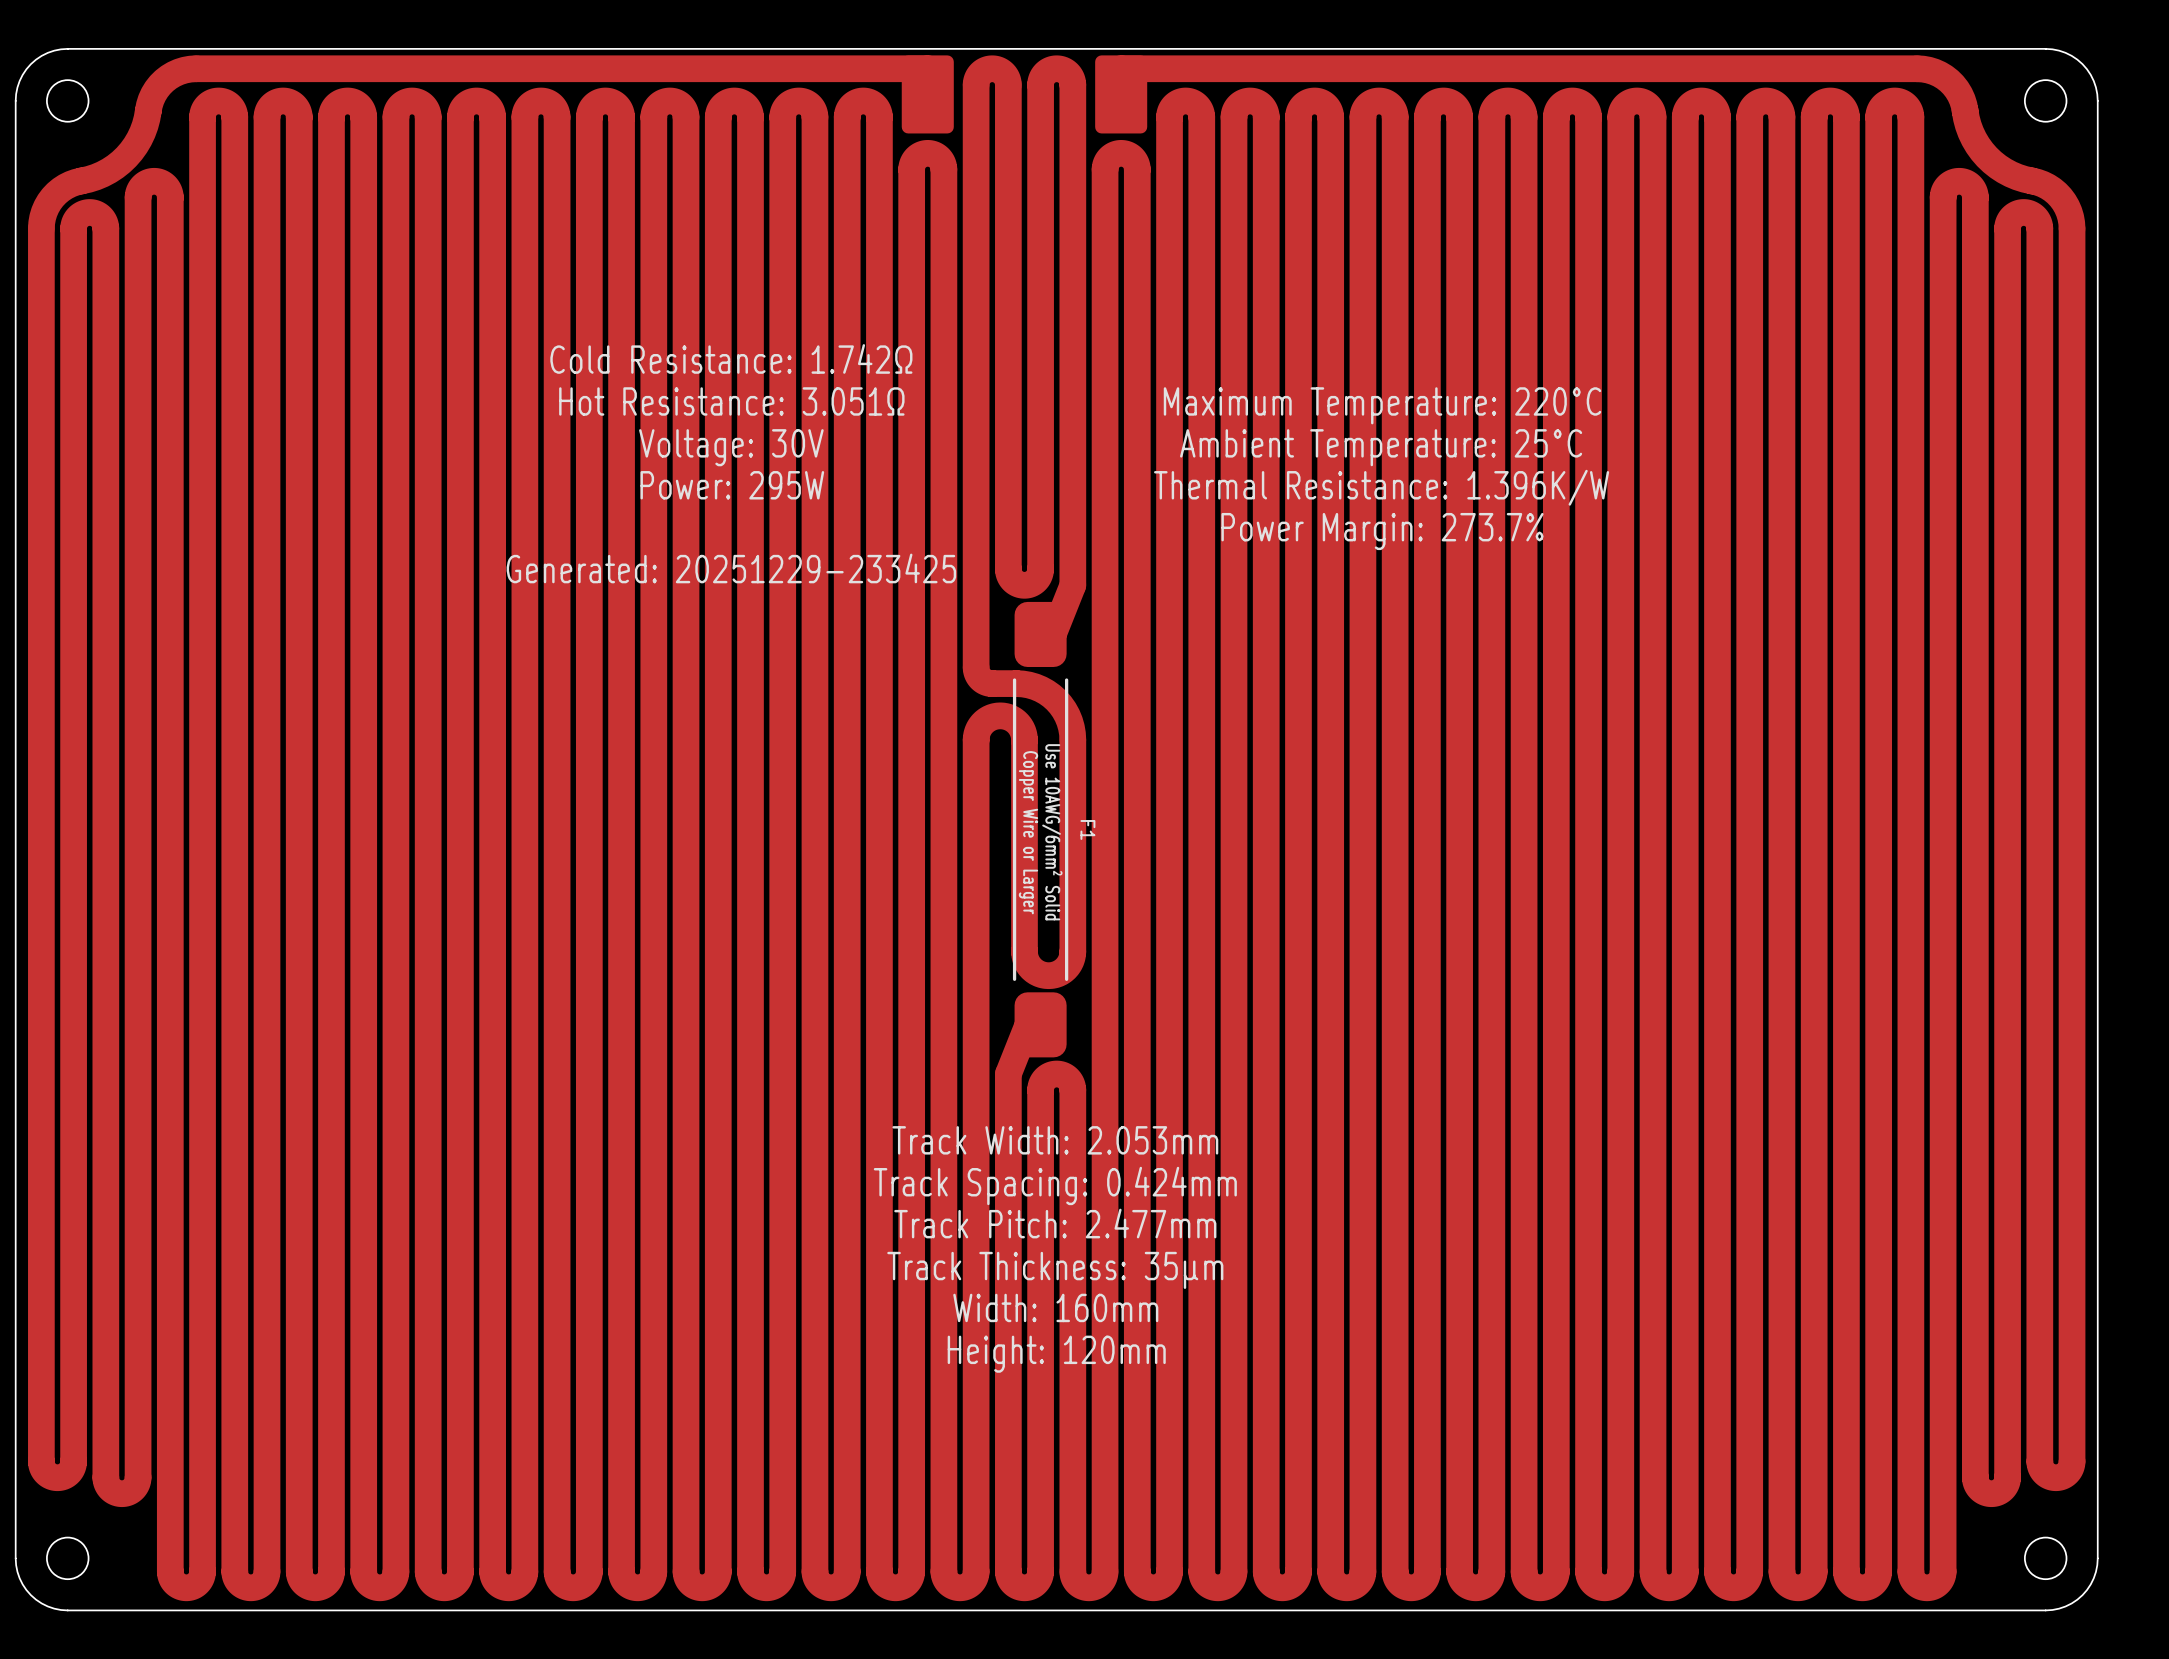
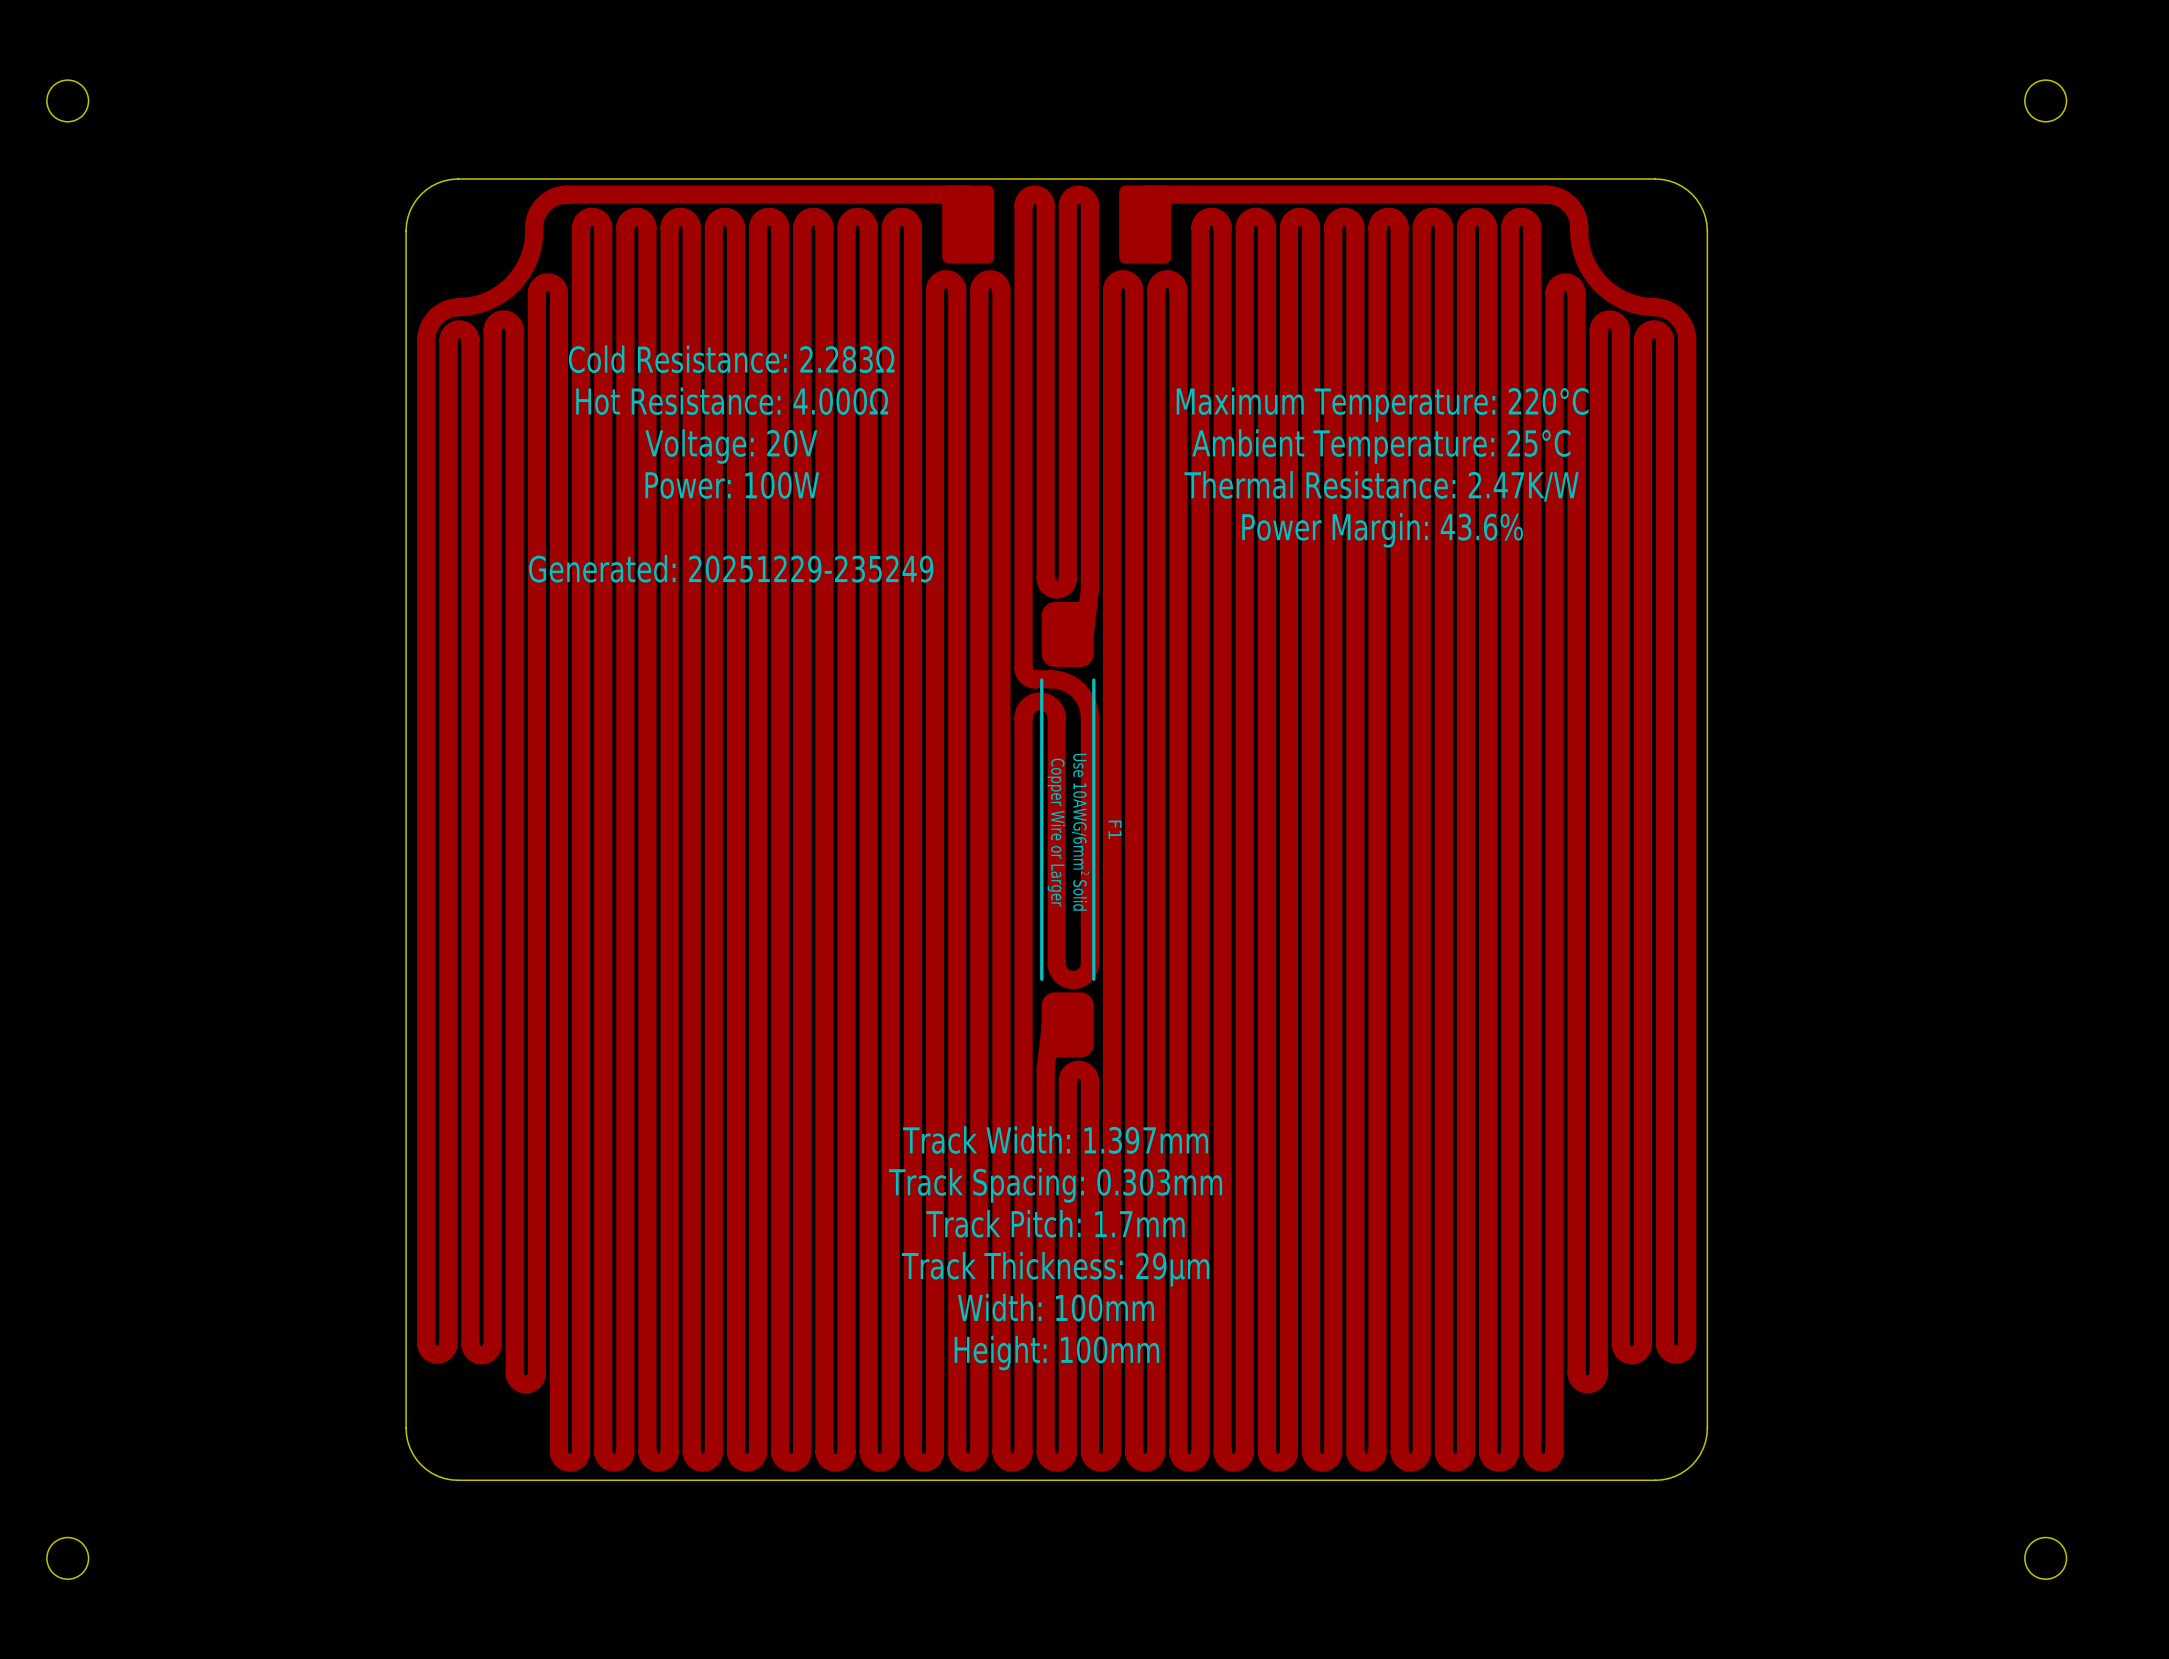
board edge: (67, 48) (2045, 48) (2065, 52) (2077, 59) (2090, 74) (2095, 87) (2097, 100) (2097, 1558) (2093, 1578) (2086, 1590) (2077, 1599) (2065, 1606) (2045, 1610) (67, 1610) (54, 1608) (36, 1599) (22, 1584) (17, 1571) (15, 1558) (15, 100) (19, 81) (30, 64) (47, 52) (67, 48) -> (458, 179) (438, 182) (421, 194) (410, 211) (406, 231) (406, 1428) (410, 1448) (421, 1465) (438, 1476) (458, 1480) (1655, 1480) (1675, 1476) (1692, 1465) (1703, 1448) (1707, 1428) (1707, 231) (1703, 211) (1692, 194) (1675, 182) (1655, 179) (458, 179)
track: (927, 94) (927, 68) (190, 69) (173, 74) (156, 89) (151, 99) (142, 132) (126, 157) (102, 174) (65, 186) (52, 197) (46, 206) (41, 228) (41, 1463) (48, 1474) (59, 1477) (69, 1472) (73, 1461) (73, 228) (77, 217) (89, 212) (101, 217) (105, 228) (105, 1477) (109, 1488) (120, 1493) (132, 1489) (137, 1479) (138, 197) (140, 189) (144, 184) (156, 181) (166, 187) (170, 197) (170, 1571) (173, 1581) (182, 1587) (190, 1587) (196, 1584) (201, 1577) (202, 1571) (202, 117) (205, 107) (212, 102) (224, 102) (231, 107) (234, 117) (234, 1571) (239, 1583) (248, 1587) (257, 1586) (262, 1583) (267, 1571) (267, 117) (272, 105) (281, 101) (290, 102) (296, 107) (299, 117) (299, 1571) (303, 1583) (313, 1587) (321, 1586) (326, 1583) (331, 1571) (331, 117) (333, 109) (338, 103) (347, 100) (355, 102) (361, 109) (363, 117) (363, 1571) (367, 1582) (377, 1587) (390, 1583) (395, 1571) (395, 117) (398, 107) (406, 102) (414, 101) (421, 103) (426, 109) (428, 117) (428, 1571) (432, 1583) (444, 1587) (455, 1583) (460, 1571) (460, 117) (464, 106) (474, 101) (487, 105) (492, 115) (492, 330) -> (1067, 634) (1084, 634) (1089, 589) (1089, 204) (1086, 197) (1078, 194) (1071, 197) (1067, 204) (1067, 578) (1064, 586) (1055, 589) (1047, 585) (1045, 578) (1045, 205) (1041, 197) (1033, 194) (1026, 198) (1023, 205) (1023, 669) (1026, 676) (1031, 678) (1056, 679) (1070, 684) (1081, 694) (1088, 708) (1089, 965) (1084, 975) (1075, 979) (1063, 977) (1057, 967) (1056, 715) (1050, 704) (1042, 701) (1035, 702) (1026, 707) (1023, 718) (1023, 1451) (1019, 1460) (1011, 1462) (1004, 1459) (1001, 1451) (1001, 290) (997, 281) (989, 279) (982, 282) (979, 290) (979, 1451) (974, 1460) (965, 1462) (959, 1458) (957, 1451) (957, 290) (953, 281) (943, 279) (937, 283) (935, 290) (935, 1451) (931, 1459) (922, 1462) (915, 1458) (912, 1451) (912, 227) (908, 219) (897, 217) (892, 222) (890, 227) (890, 1451) (887, 1459) (877, 1462) (871, 1459) (868, 1451) (868, 227) (863, 218) (852, 218) (846, 227) (846, 1451) (842, 1460) (832, 1462) (826, 1458) (824, 1451) (824, 227) (818, 218) (807, 218) (802, 227) (802, 1451) (797, 1460) (788, 1462) (782, 1458) (780, 1451) (780, 227) (774, 218) (769, 216) (762, 219) (758, 227) (758, 1451) (753, 1460) (743, 1462) (737, 1457) (735, 1451) (735, 227) (730, 218) (723, 216) (718, 219) (713, 227) (713, 1451) (709, 1460) (698, 1462) (693, 1457) (691, 1451) (691, 227) (689, 221) (684, 217) (677, 217) (672, 219) (669, 227) (669, 1451) (667, 1457) (663, 1461) (653, 1461) (649, 1457) (647, 1451) (647, 227) (645, 221) (640, 217) (633, 217) (628, 219) (625, 227) (625, 1451) (619, 1461) (608, 1461) (603, 1451) (603, 227) (600, 221) (595, 217) (589, 217) (583, 221) (581, 227) (581, 1451) (576, 1460) (570, 1462) (564, 1461) (560, 1456) (558, 1451) (558, 293) (556, 286) (550, 282) (543, 283) (538, 287) (536, 293) (536, 1373) (533, 1381) (525, 1384) (517, 1380) (514, 1373) (514, 330) (511, 322) (503, 319) (495, 322) (492, 330)
part: (927, 94) -> none
track: (1121, 94) (1121, 68) (1922, 69) (1944, 77) (1956, 89) (1962, 99) (1970, 132) (1986, 157) (2010, 174) (2047, 186) (2056, 193) (2066, 206) (2072, 228) (2071, 1463) (2065, 1474) (2055, 1477) (2044, 1473) (2039, 1461) (2039, 228) (2034, 216) (2023, 212) (2011, 217) (2007, 228) (2007, 1477) (2002, 1488) (1991, 1493) (1981, 1490) (1975, 1479) (1975, 197) (1970, 185) (1963, 181) (1957, 181) (1947, 185) (1943, 197) (1943, 1571) (1940, 1580) (1930, 1587) (1923, 1587) (1916, 1583) (1910, 1571) (1910, 117) (1908, 107) (1900, 102) (1890, 101) (1881, 107) (1878, 117) (1878, 1571) (1874, 1582) (1866, 1587) (1853, 1584) (1848, 1579) (1846, 1571) (1846, 117) (1840, 105) (1834, 101) (1824, 102) (1817, 107) (1814, 117) (1814, 1571) (1809, 1583) (1800, 1587) (1788, 1584) (1784, 1579) (1781, 1571) (1781, 117) (1780, 109) (1774, 103) (1767, 101) (1758, 102) (1751, 109) (1749, 117) (1749, 1571) (1745, 1583) (1735, 1587) (1729, 1587) (1722, 1583) (1717, 1571) (1717, 117) (1714, 107) (1707, 102) (1699, 101) (1692, 103) (1687, 109) (1685, 117) (1685, 1571) (1681, 1582) (1669, 1587) (1658, 1583) (1653, 1571) (1653, 117) (1648, 106) (1638, 101) (1627, 103) (1620, 115) (1620, 330) -> (1067, 1024) (1050, 1024) (1045, 1069) (1045, 1453) (1048, 1459) (1056, 1462) (1064, 1459) (1067, 1453) (1067, 1080) (1072, 1072) (1080, 1069) (1087, 1074) (1089, 1080) (1089, 1451) (1093, 1459) (1102, 1462) (1109, 1459) (1112, 1451) (1112, 290) (1115, 281) (1124, 279) (1131, 282) (1134, 290) (1134, 1451) (1138, 1460) (1146, 1462) (1153, 1458) (1156, 1451) (1156, 290) (1159, 282) (1168, 279) (1175, 282) (1178, 290) (1178, 1451) (1182, 1460) (1192, 1462) (1198, 1458) (1200, 1451) (1200, 227) (1203, 219) (1213, 216) (1219, 219) (1222, 227) (1222, 1451) (1227, 1460) (1237, 1462) (1242, 1457) (1244, 1451) (1244, 227) (1249, 219) (1258, 217) (1264, 221) (1266, 227) (1266, 1451) (1272, 1461) (1282, 1461) (1287, 1457) (1288, 1451) (1288, 227) (1293, 219) (1302, 217) (1308, 221) (1311, 227) (1311, 1451) (1315, 1460) (1322, 1462) (1327, 1461) (1331, 1456) (1333, 1451) (1333, 227) (1337, 219) (1348, 217) (1353, 222) (1355, 227) (1355, 1451) (1356, 1456) (1361, 1461) (1367, 1462) (1372, 1460) (1377, 1451) (1377, 227) (1381, 219) (1392, 217) (1398, 222) (1399, 227) (1399, 1451) (1401, 1457) (1405, 1461) (1411, 1462) (1417, 1459) (1421, 1451) (1421, 227) (1426, 219) (1437, 217) (1442, 222) (1443, 227) (1443, 1451) (1446, 1458) (1450, 1461) (1456, 1462) (1462, 1459) (1465, 1451) (1465, 227) (1471, 218) (1482, 218) (1488, 227) (1488, 1451) (1489, 1457) (1494, 1461) (1502, 1462) (1506, 1459) (1510, 1451) (1510, 227) (1515, 218) (1526, 218) (1532, 227) (1532, 1451) (1533, 1457) (1539, 1461) (1544, 1462) (1551, 1459) (1554, 1451) (1554, 293) (1556, 286) (1561, 283) (1568, 282) (1574, 286) (1576, 293) (1576, 1373) (1580, 1381) (1587, 1384) (1595, 1380) (1598, 1373) (1598, 330) (1601, 322) (1609, 319) (1617, 322) (1620, 330)
part: (1121, 94) -> none
track width: thick (492, 117) (492, 1571) -> thin (492, 117) (492, 1571)
track width: thick (1620, 117) (1620, 1571) -> thin (1620, 117) (1620, 1571)
part: none -> (968, 224)
part: none -> (1145, 224)
text: Cold Resistance: 1.742Ω (731, 358) -> Cold Resistance: 2.283Ω (731, 359)
text: Hot Resistance: 3.051Ω (731, 401) -> Hot Resistance: 4.000Ω (732, 401)
text: Voltage: 30V (731, 447) -> Voltage: 20V (731, 446)
text: Power: 295W (732, 485) -> Power: 100W (732, 485)
text: Thermal Resistance: 1.396K/W (1381, 487) -> Thermal Resistance: 2.47K/W (1381, 486)
text: Power Margin: 273.7% (1382, 531) -> Power Margin: 43.6% (1382, 530)
text: Generated: 20251229-233425 (731, 568) -> Generated: 20251229-235249 (731, 568)
track: (1040, 634) (1053, 634) (1072, 585) (1072, 82) (1068, 73) (1056, 68) (1045, 73) (1040, 82) (1040, 569) (1035, 581) (1022, 585) (1012, 579) (1008, 569) (1008, 84) (1003, 73) (998, 69) (990, 68) (979, 75) (976, 84) (976, 669) (979, 677) (988, 683) (1022, 683) (1046, 692) (1060, 704) (1069, 721) (1072, 740) (1072, 954) (1065, 968) (1051, 975) (1036, 972) (1026, 960) (1024, 951) (1024, 737) (1021, 728) (1014, 720) (1003, 716) (991, 717) (980, 726) (976, 740) (976, 1571) (970, 1583) (958, 1587) (947, 1582) (943, 1571) (943, 169) (942, 163) (937, 156) (925, 153) (916, 158) (911, 169) (911, 1571) (909, 1579) (905, 1584) (899, 1587) (891, 1587) (882, 1581) (879, 1571) (879, 117) (877, 109) (872, 103) (859, 101) (851, 106) (847, 117) (847, 1571) (845, 1579) (840, 1584) (827, 1587) (817, 1580) (814, 1571) (814, 117) (813, 109) (808, 103) (798, 100) (791, 102) (784, 109) (782, 117) (782, 1571) (781, 1577) (776, 1584) (770, 1587) (762, 1587) (753, 1581) (750, 1571) (750, 117) (748, 109) (743, 103) (736, 101) (726, 102) (721, 107) (718, 117) (718, 1571) (716, 1579) (711, 1584) (704, 1587) (696, 1586) (688, 1580) (686, 1571) (686, 117) (683, 107) (677, 102) (669, 100) (660, 103) (655, 109) (653, 117) (653, 1571) (651, 1579) (645, 1585) (637, 1587) (631, 1586) (623, 1579) (621, 1571) (621, 117) (619, 109) (612, 102) (603, 101) (594, 105) (589, 117) (589, 1571) (587, 1579) (582, 1584) (573, 1587) (565, 1585) (559, 1580) (557, 1571) (557, 117) (554, 107) (546, 102) (539, 101) (530, 105) (524, 117) (524, 1571) (520, 1582) (510, 1587) (499, 1584) (492, 1573) (492, 1344) -> (968, 224) (968, 194) (559, 195) (546, 202) (538, 210) (534, 221) (533, 243) (529, 258) (513, 283) (488, 300) (442, 311) (435, 317) (428, 327) (426, 340) (426, 1344) (429, 1351) (437, 1354) (445, 1350) (448, 1343) (448, 340) (451, 333) (459, 329) (466, 332) (470, 340) (470, 1344) (473, 1352) (481, 1355) (489, 1352) (492, 1344)
F1 position: (1040, 829) -> (1067, 829)
track: (1040, 1024) (1027, 1024) (1008, 1073) (1008, 1573) (1013, 1583) (1024, 1587) (1035, 1583) (1040, 1573) (1040, 1090) (1045, 1078) (1050, 1075) (1058, 1074) (1068, 1078) (1072, 1090) (1072, 1573) (1078, 1583) (1090, 1587) (1101, 1582) (1105, 1571) (1105, 169) (1106, 163) (1111, 156) (1123, 153) (1133, 159) (1137, 169) (1137, 1571) (1138, 1577) (1143, 1584) (1149, 1587) (1157, 1587) (1166, 1581) (1169, 1571) (1169, 117) (1174, 105) (1187, 101) (1197, 106) (1201, 117) (1201, 1571) (1203, 1579) (1208, 1584) (1215, 1587) (1223, 1586) (1231, 1580) (1233, 1571) (1233, 117) (1239, 105) (1246, 101) (1253, 101) (1263, 107) (1266, 117) (1266, 1571) (1268, 1579) (1273, 1584) (1280, 1587) (1288, 1586) (1295, 1580) (1298, 1571) (1298, 117) (1300, 109) (1305, 103) (1318, 101) (1327, 107) (1330, 117) (1330, 1571) (1332, 1579) (1338, 1585) (1346, 1587) (1354, 1585) (1360, 1579) (1362, 1571) (1362, 117) (1364, 109) (1369, 103) (1377, 101) (1384, 102) (1392, 107) (1395, 117) (1395, 1571) (1398, 1580) (1403, 1585) (1413, 1587) (1420, 1584) (1425, 1579) (1427, 1571) (1427, 117) (1429, 109) (1434, 103) (1441, 101) (1449, 102) (1456, 107) (1459, 117) (1459, 1571) (1462, 1580) (1470, 1586) (1477, 1587) (1486, 1583) (1491, 1571) (1491, 117) (1493, 109) (1498, 103) (1506, 101) (1515, 102) (1522, 109) (1524, 117) (1524, 1571) (1526, 1580) (1532, 1585) (1542, 1587) (1550, 1583) (1556, 1571) (1556, 117) (1558, 109) (1563, 103) (1572, 100) (1579, 102) (1586, 109) (1588, 117) (1588, 1571) (1592, 1582) (1602, 1587) (1613, 1584) (1620, 1573) (1620, 1344) -> (1145, 224) (1145, 194) (1553, 195) (1567, 202) (1574, 210) (1578, 221) (1580, 243) (1584, 258) (1600, 283) (1625, 300) (1670, 311) (1677, 317) (1684, 327) (1687, 340) (1687, 1343) (1683, 1351) (1676, 1354) (1668, 1351) (1665, 1343) (1665, 340) (1661, 332) (1654, 329) (1646, 332) (1642, 340) (1642, 1344) (1640, 1351) (1631, 1355) (1623, 1351) (1620, 1344)
text: Track Width: 2.053mm (1055, 1140) -> Track Width: 1.397mm (1055, 1140)
text: Track Spacing: 0.424mm (1055, 1185) -> Track Spacing: 0.303mm (1055, 1185)
text: Track Pitch: 2.477mm (1055, 1223) -> Track Pitch: 1.7mm (1055, 1223)
text: Track Thickness: 35µm (1055, 1270) -> Track Thickness: 29µm (1055, 1269)
text: Width: 160mm (1055, 1307) -> Width: 100mm (1056, 1307)
text: Height: 120mm (1056, 1354) -> Height: 100mm (1056, 1353)

